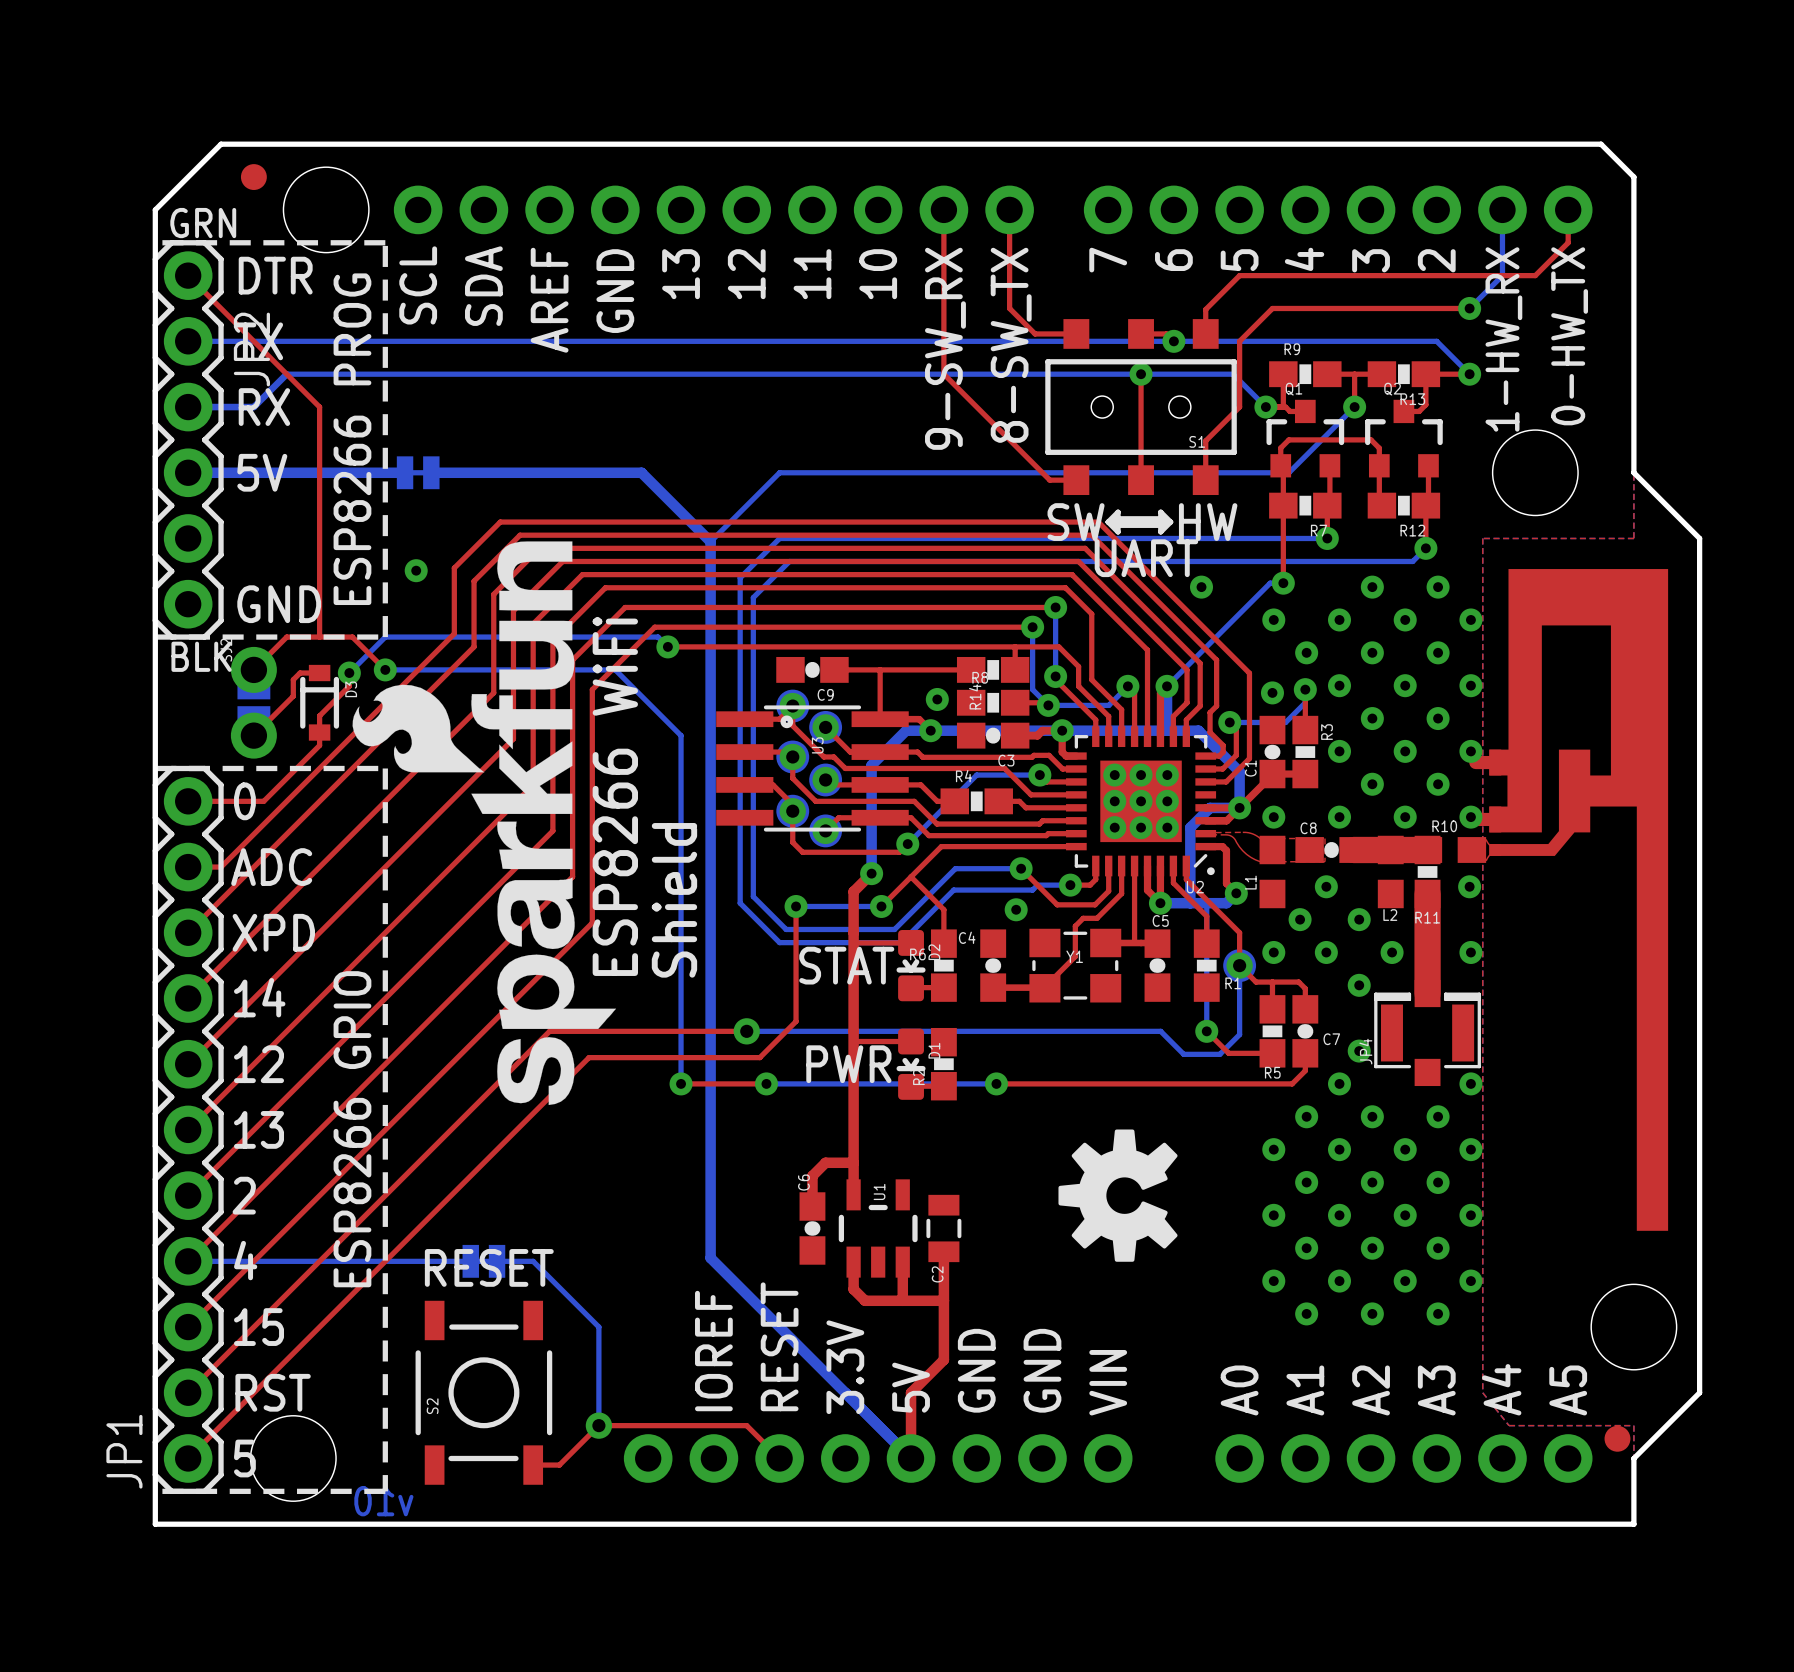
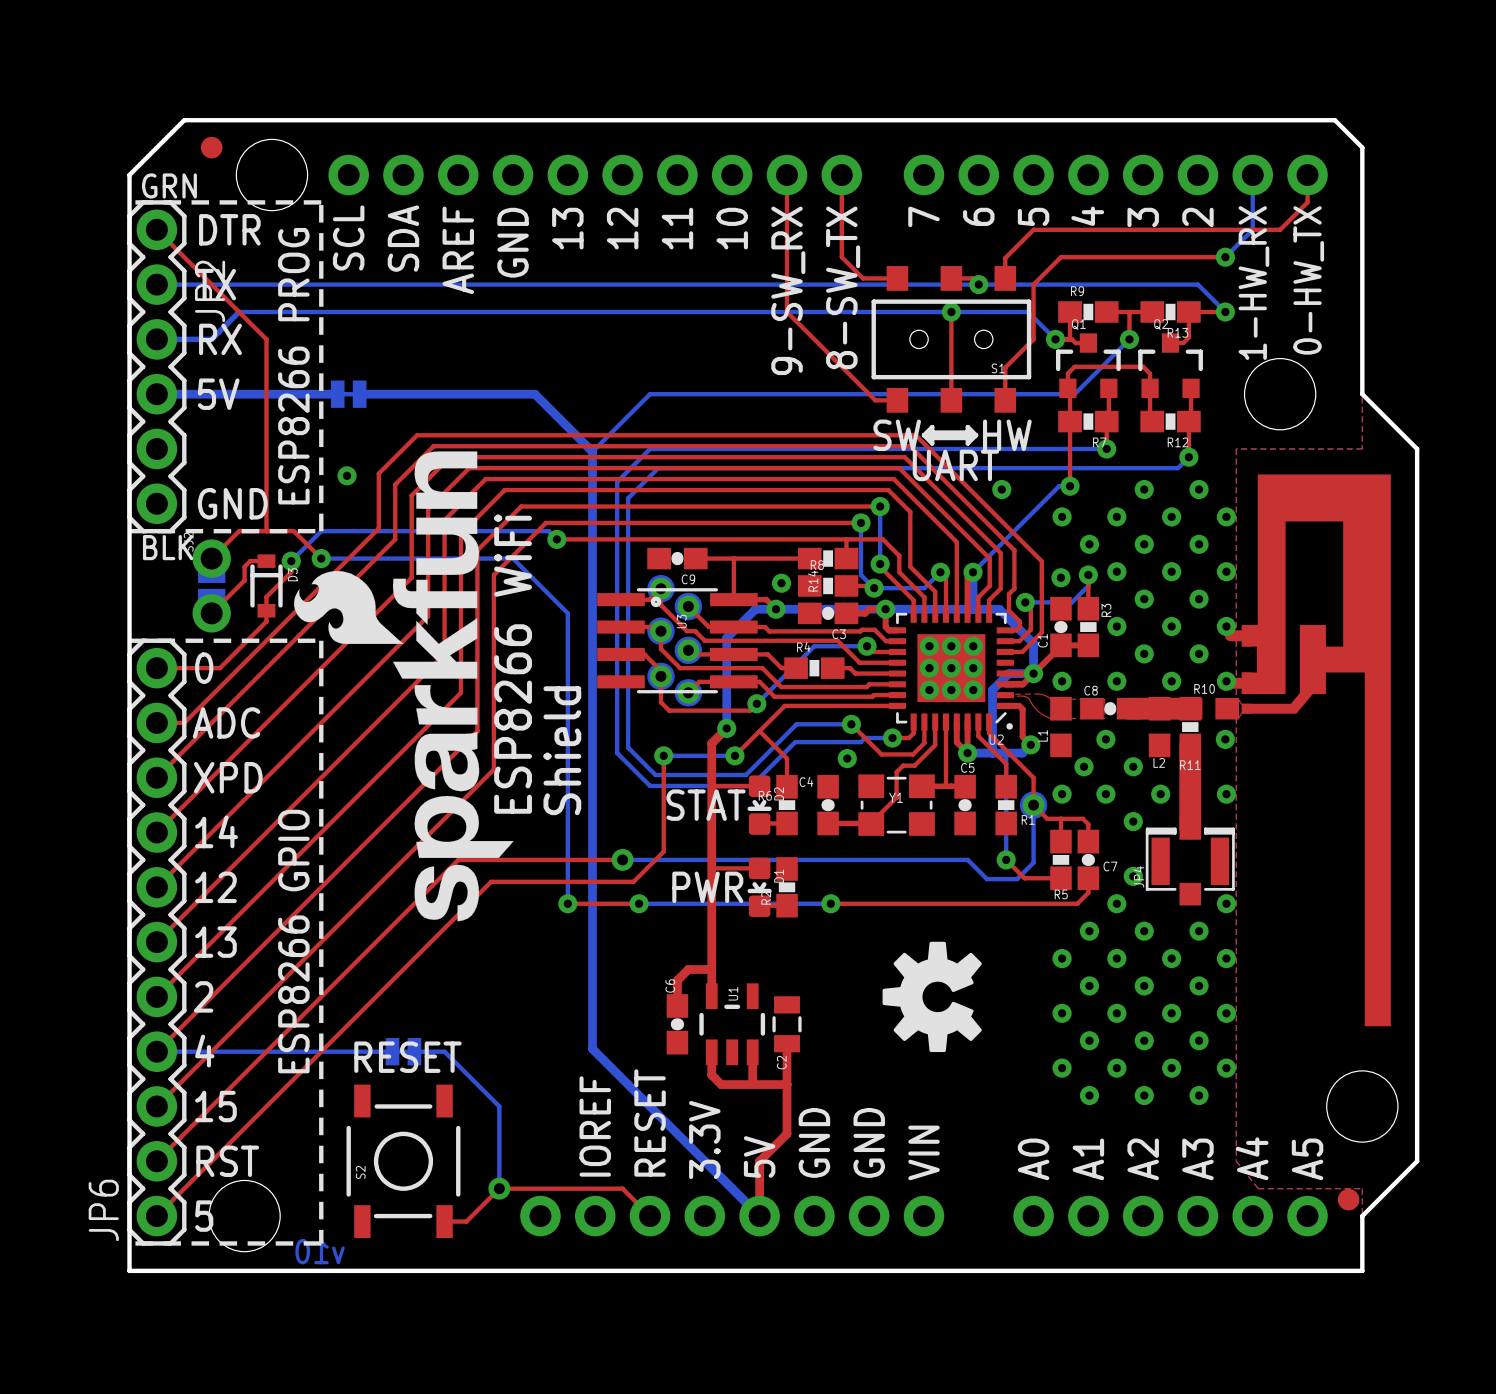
JP1 name: JP1 (124, 1451) -> JP6 (103, 1210)

